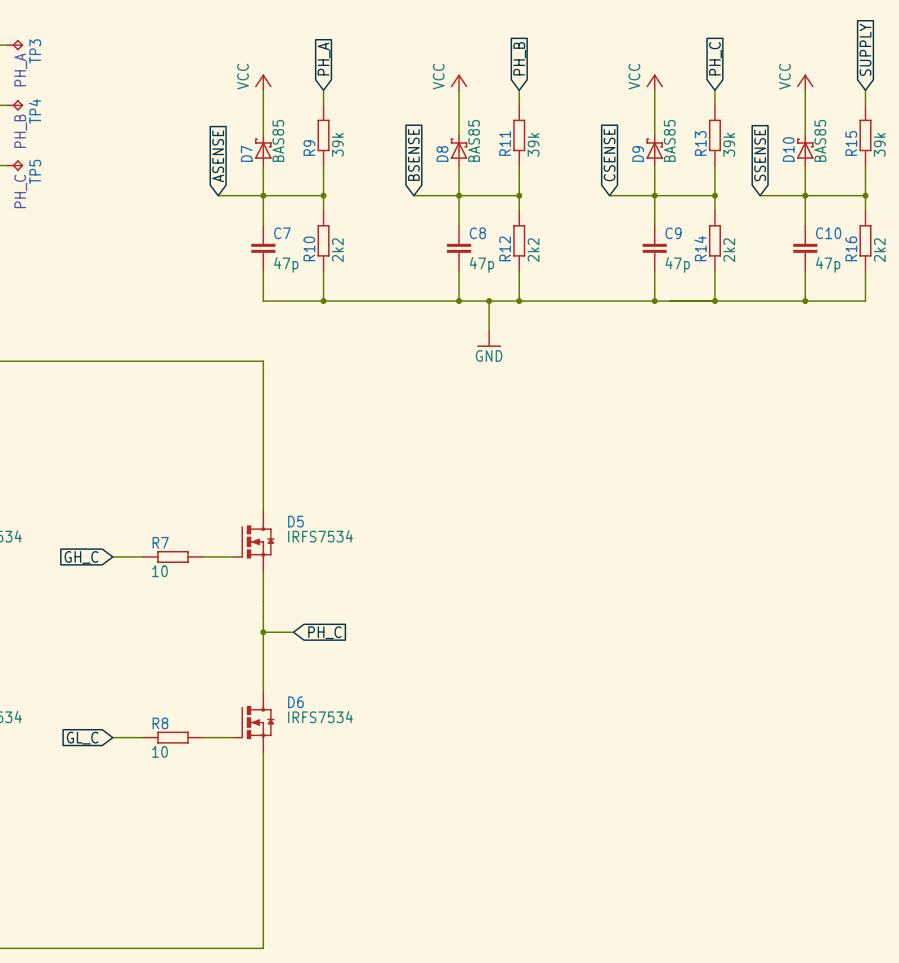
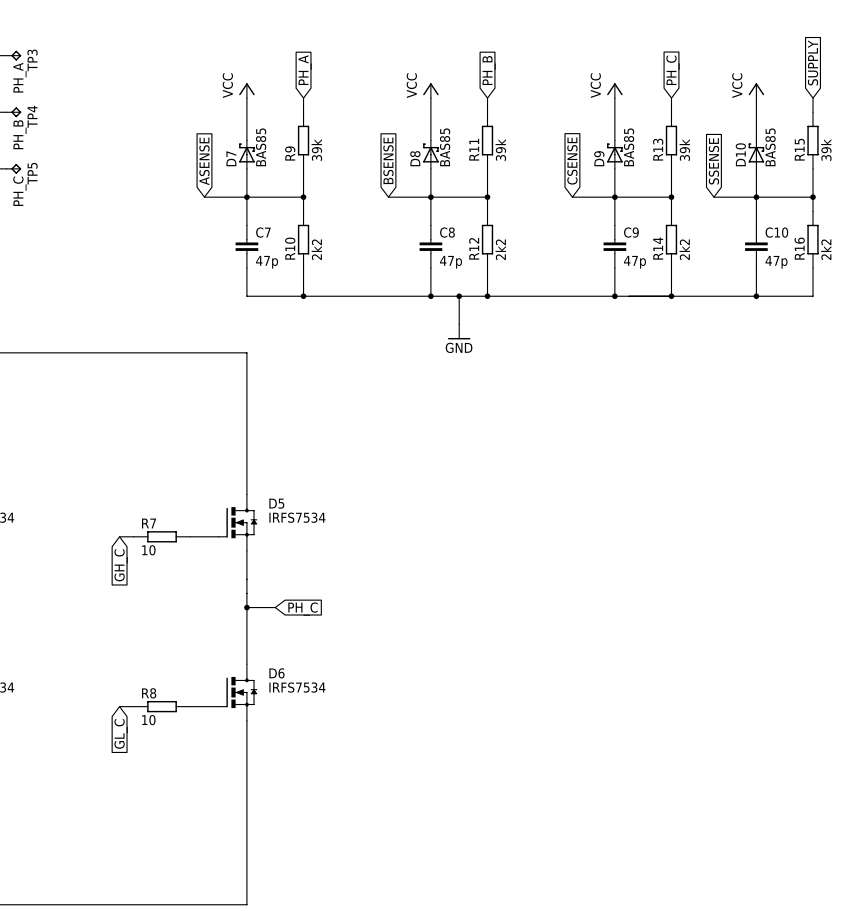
wire: (112, 556) (127, 556) -> none
global label rotation: 0° (81, 557) -> 90° counterclockwise (121, 565)
wire: (112, 737) (127, 737) -> none
global label rotation: 0° (82, 738) -> 90° counterclockwise (121, 733)

